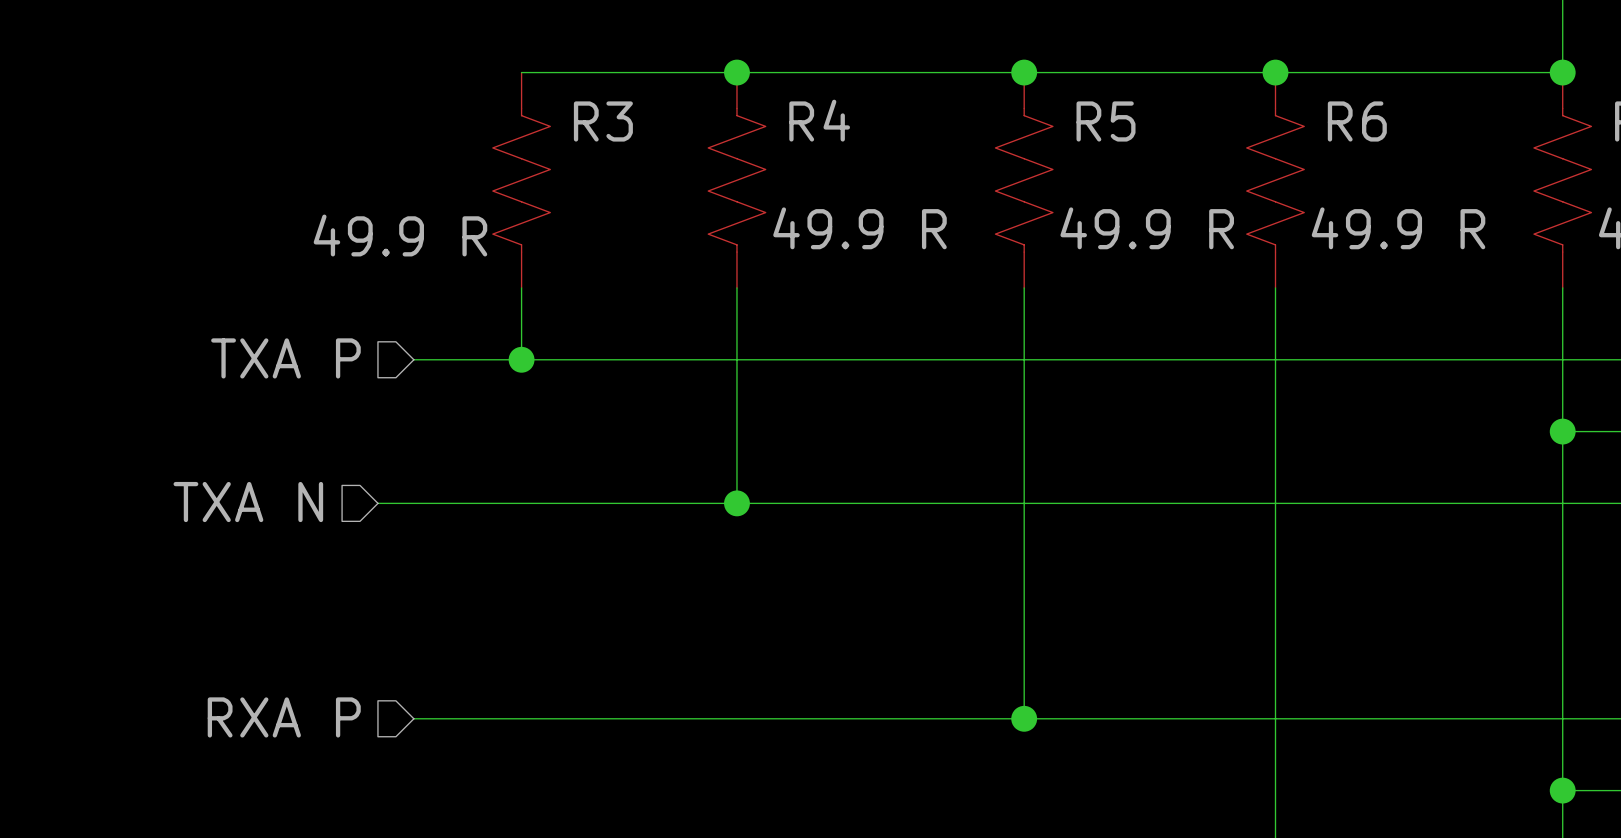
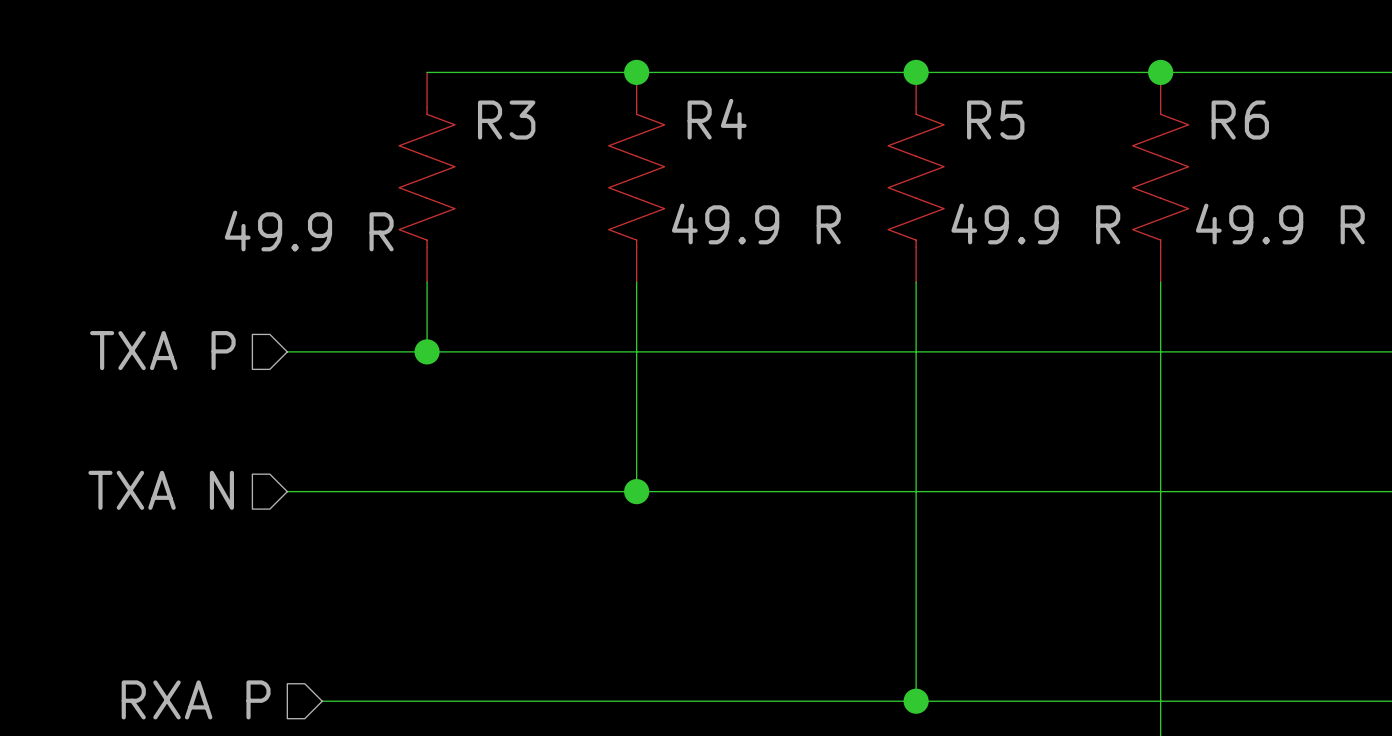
hierarchical label position: TXA P (285, 358) -> TXA P (162, 350)
wire: none -> (287, 351) (322, 351)

